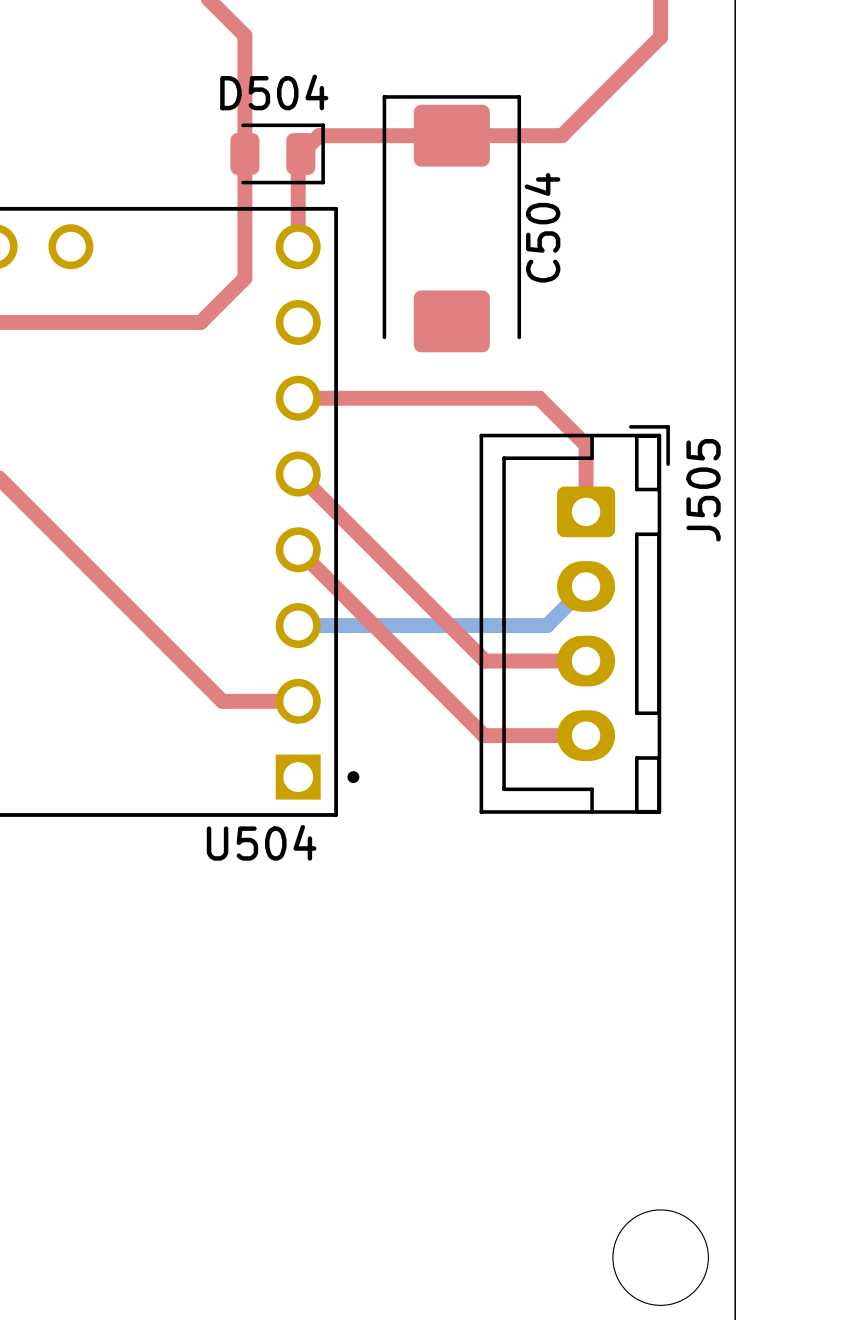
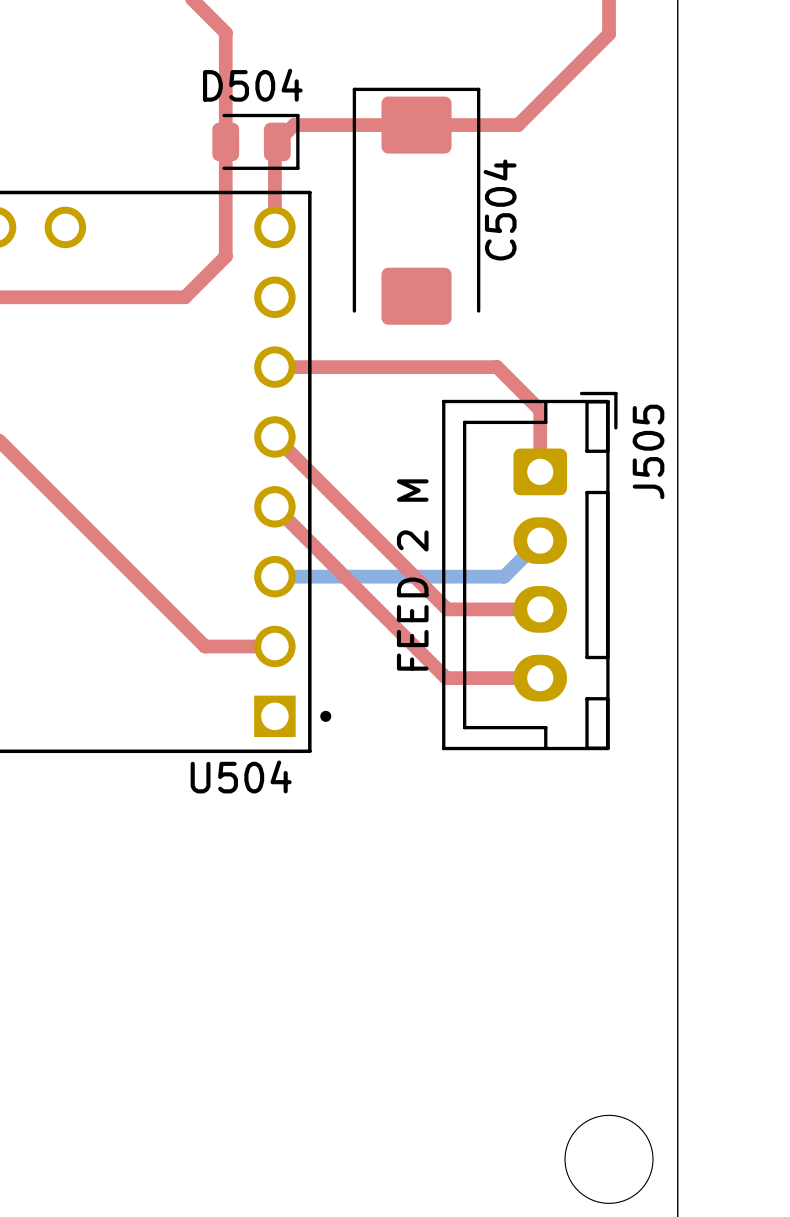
J505 value: none -> FEED 2 M (412, 575)

